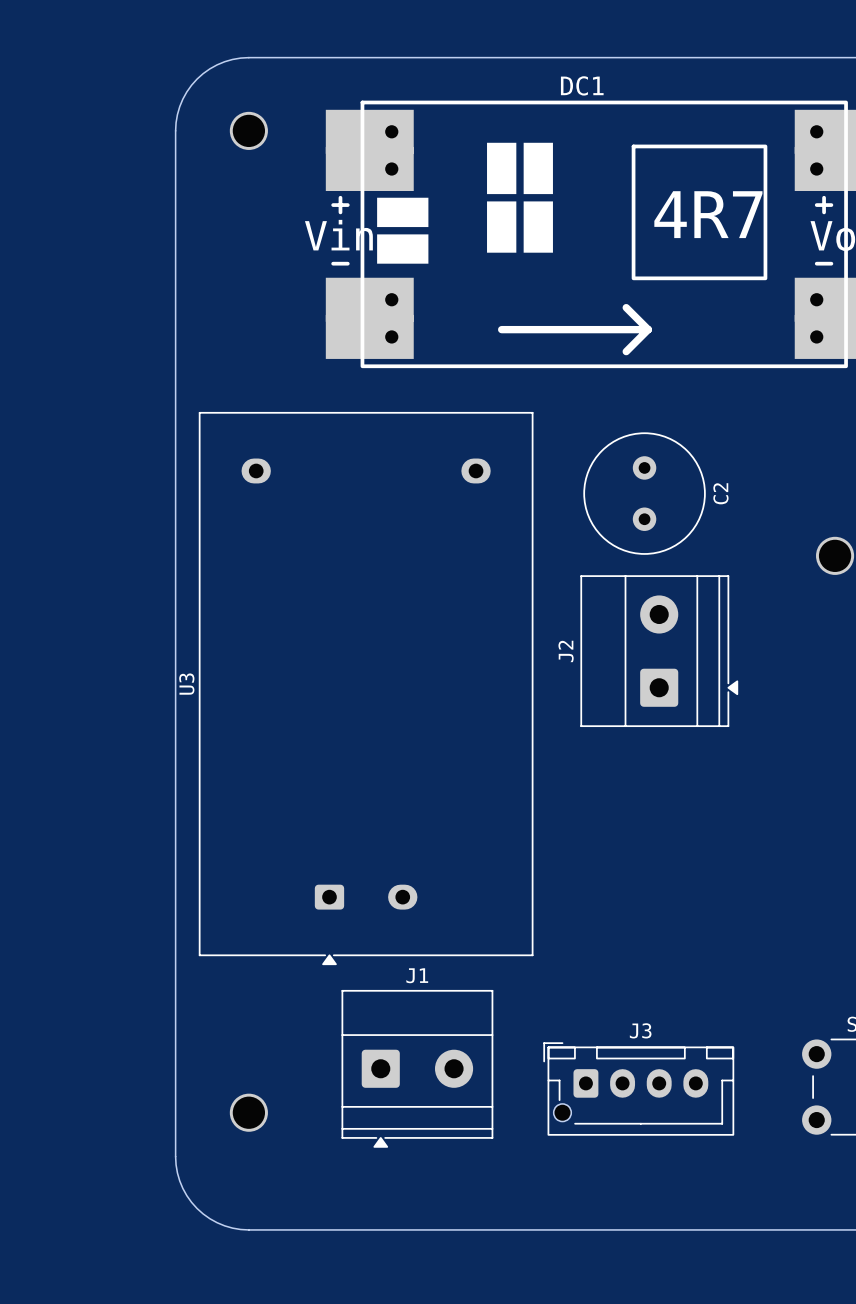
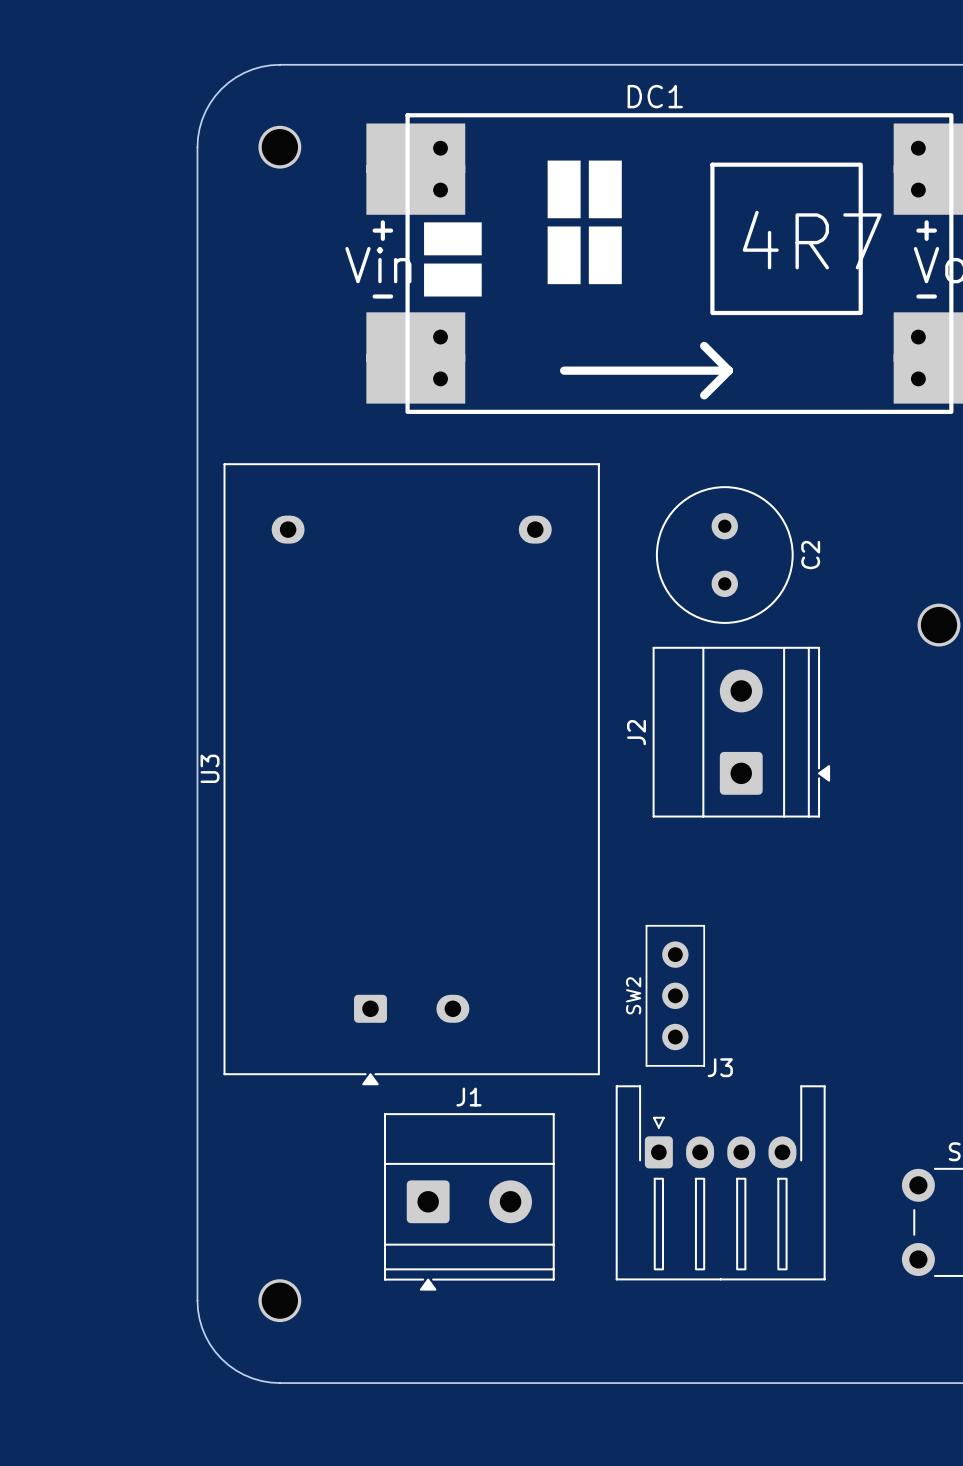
SW2: none -> (675, 995)
J3 name position: J3 (640, 1030) -> J3 (720, 1067)
J3 footprint: [543, 1042, 735, 1136] -> [615, 1085, 826, 1281]
part position: (248, 1112) -> (279, 1300)

